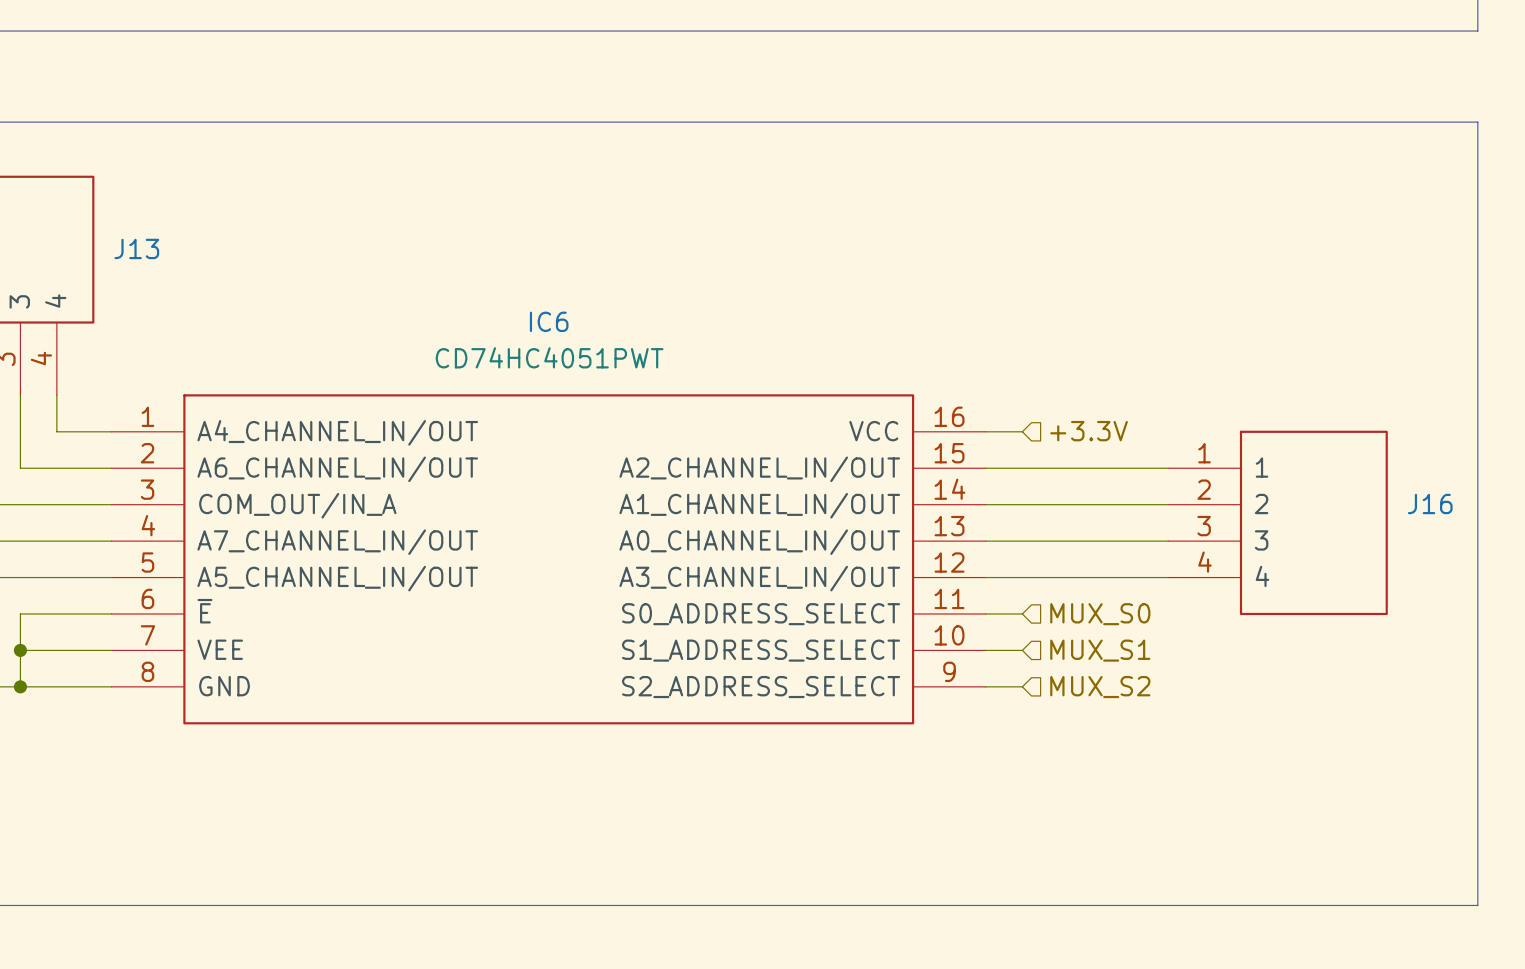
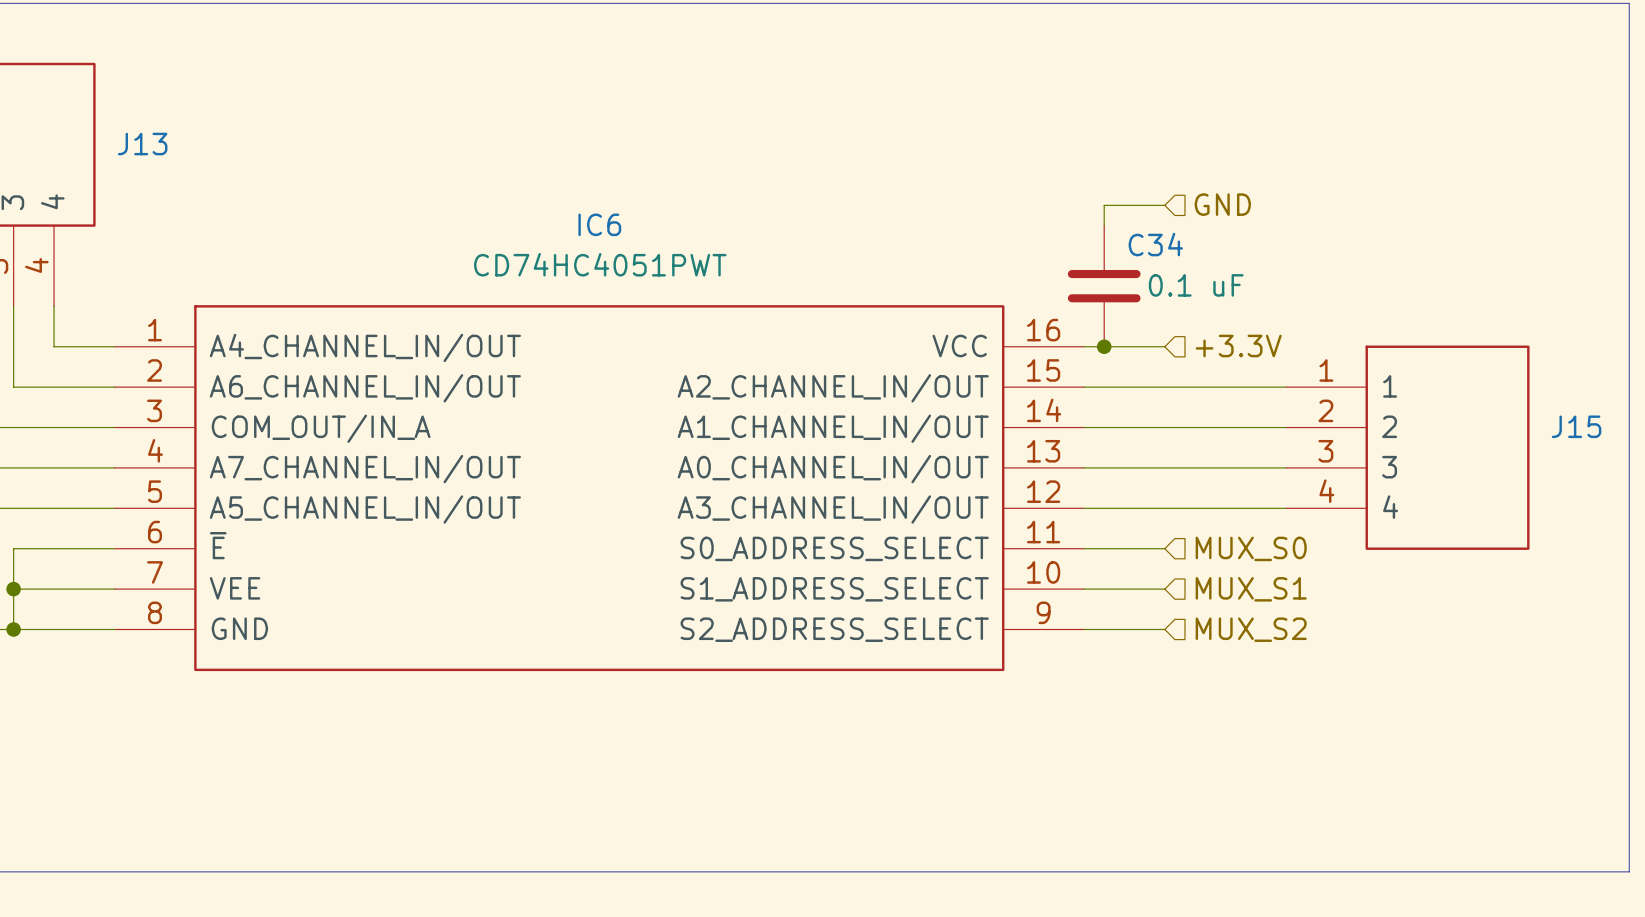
hierarchical label: none -> GND (1222, 204)
wire: none -> (1164, 205) (1104, 205) (1104, 225)
C34: none -> 0.1 uF (1104, 286)
junction: none -> (1104, 346)
wire: none -> (1124, 346) (1164, 346)
hierarchical label position: +3.3V (1089, 431) -> +3.3V (1238, 345)
J16 name: J16 (1430, 504) -> J15 (1576, 426)
wire: none -> (1124, 548) (1164, 548)
hierarchical label position: MUX_S0 (1100, 614) -> MUX_S0 (1251, 548)
wire: none -> (1124, 589) (1164, 589)
hierarchical label position: MUX_S1 (1100, 650) -> MUX_S1 (1251, 589)
wire: none -> (1124, 629) (1164, 629)
hierarchical label position: MUX_S2 (1100, 687) -> MUX_S2 (1251, 629)

